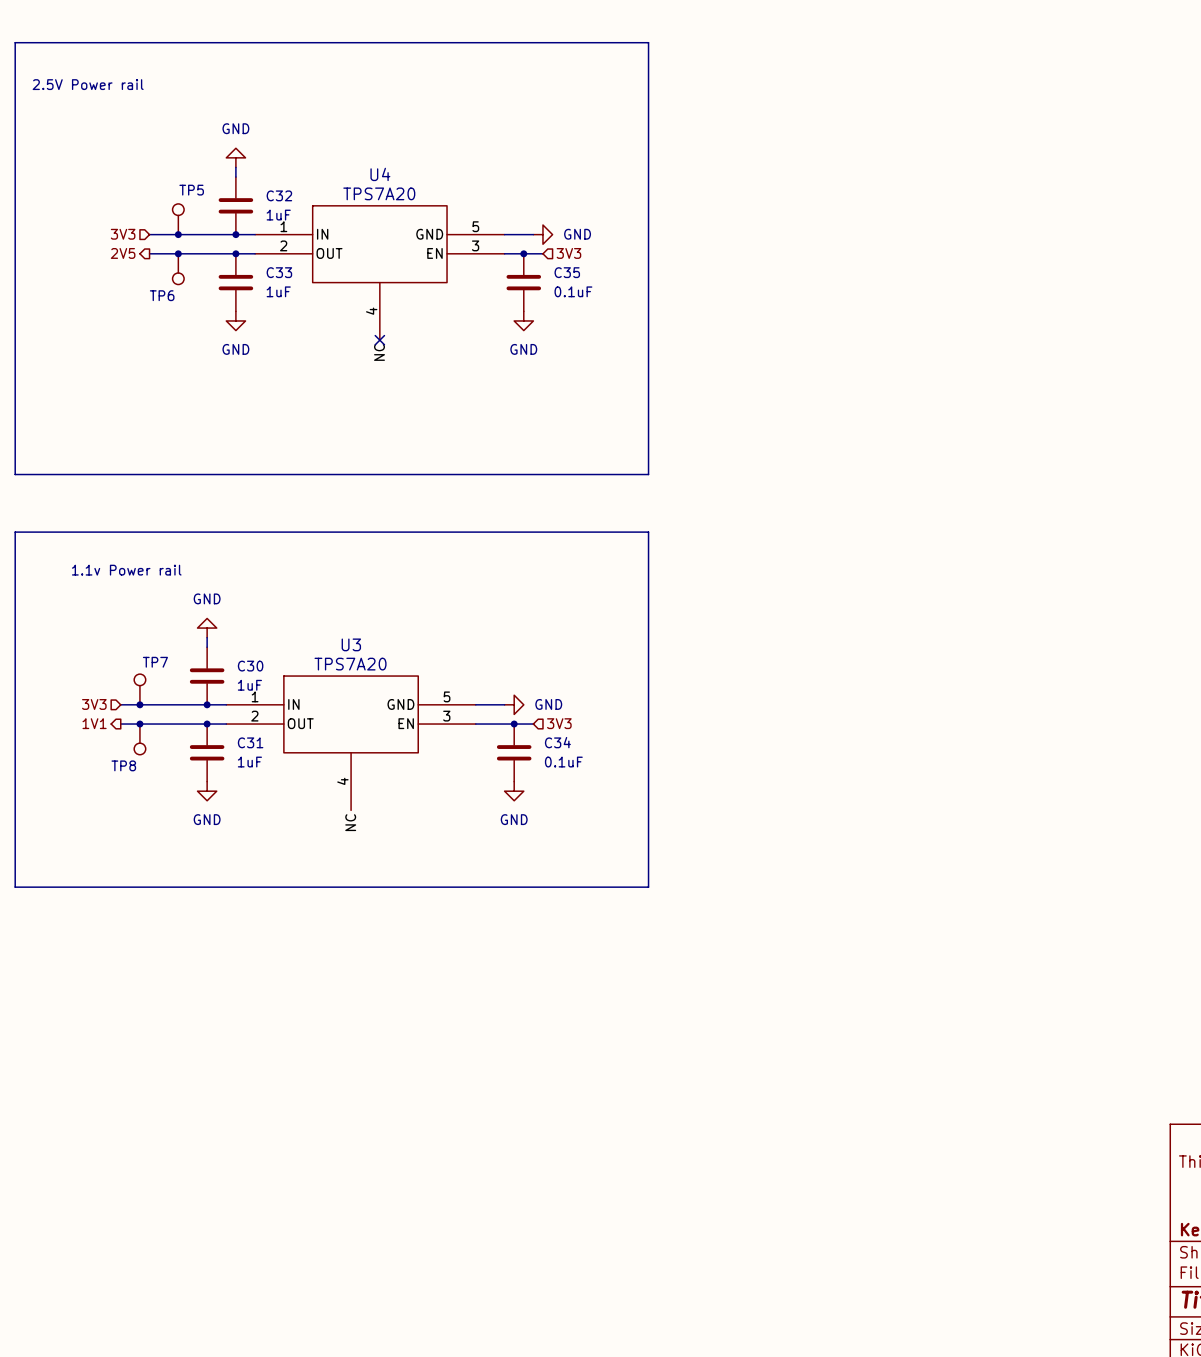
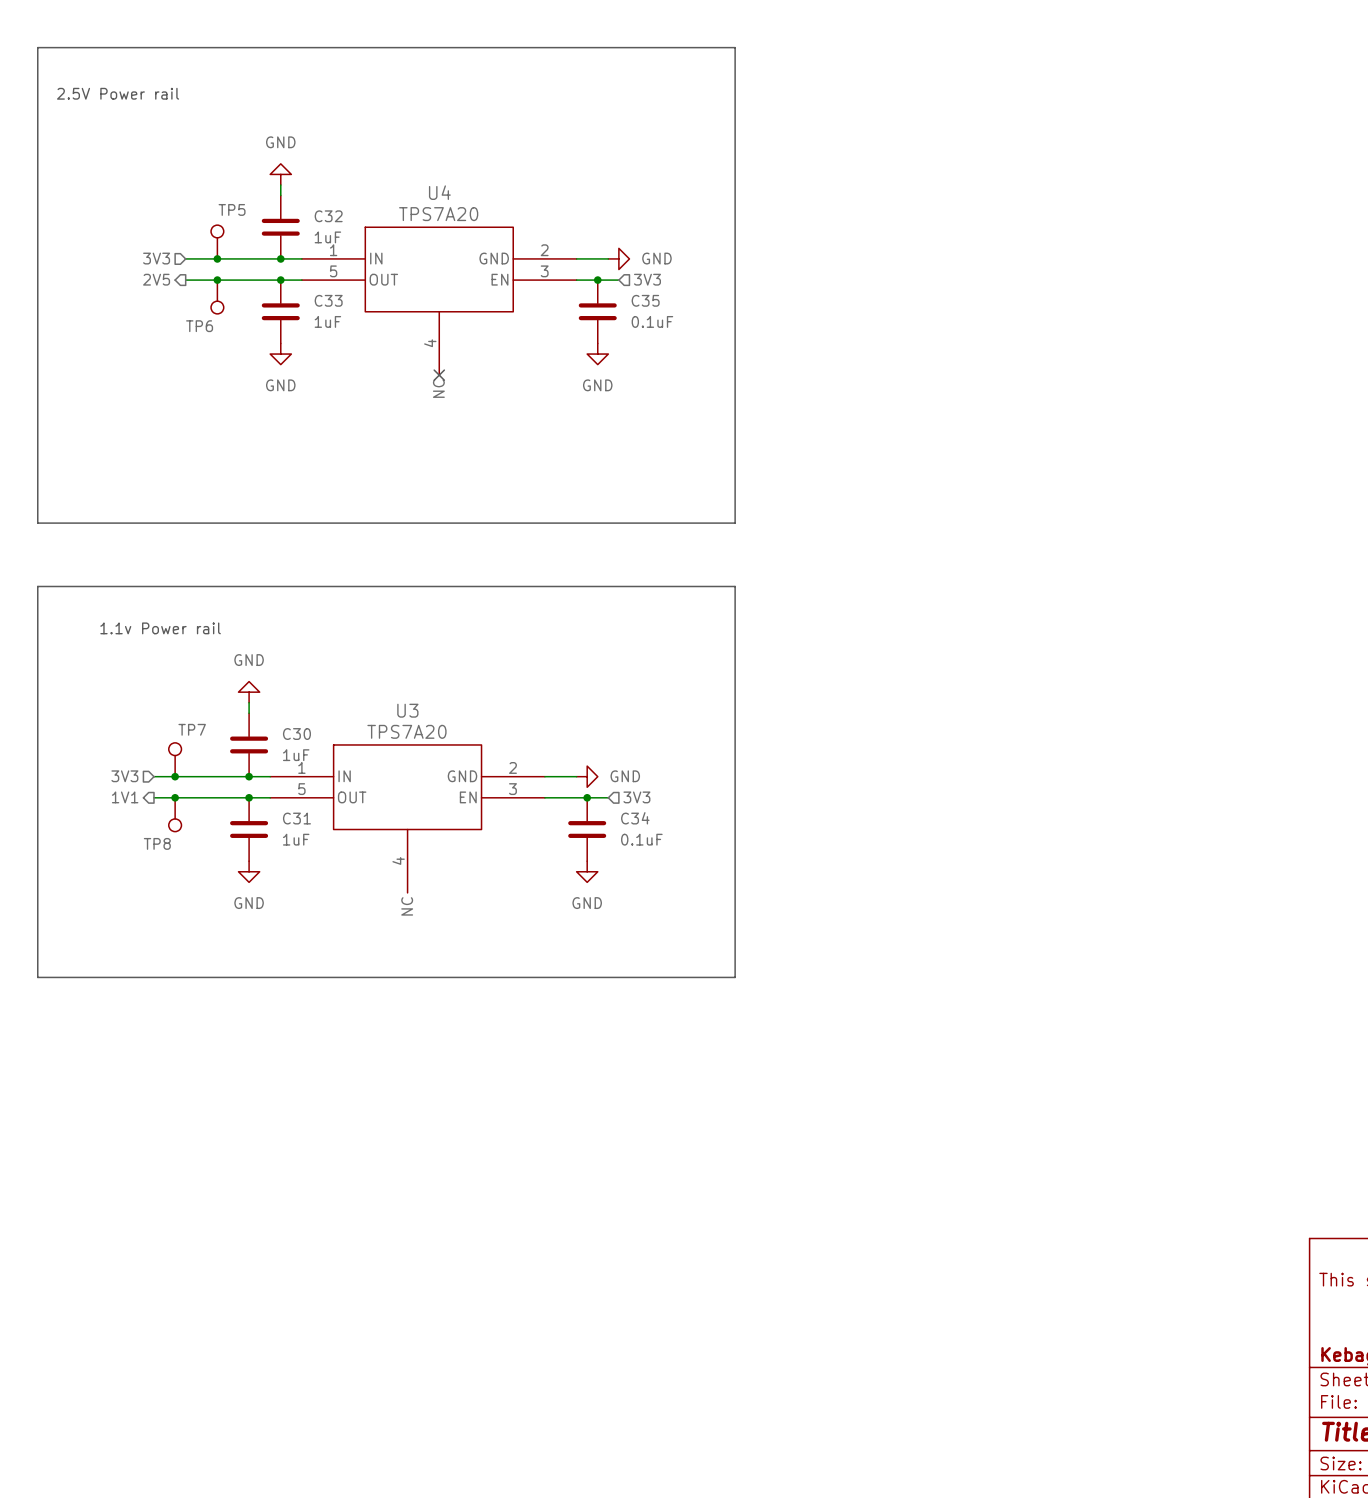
U4 pin number: 5 (475, 226) -> 2 (544, 250)
U4 pin number: 2 (283, 245) -> 5 (333, 271)
U3 pin number: 5 (447, 696) -> 2 (512, 767)
U3 pin number: 2 (254, 716) -> 5 (301, 789)

